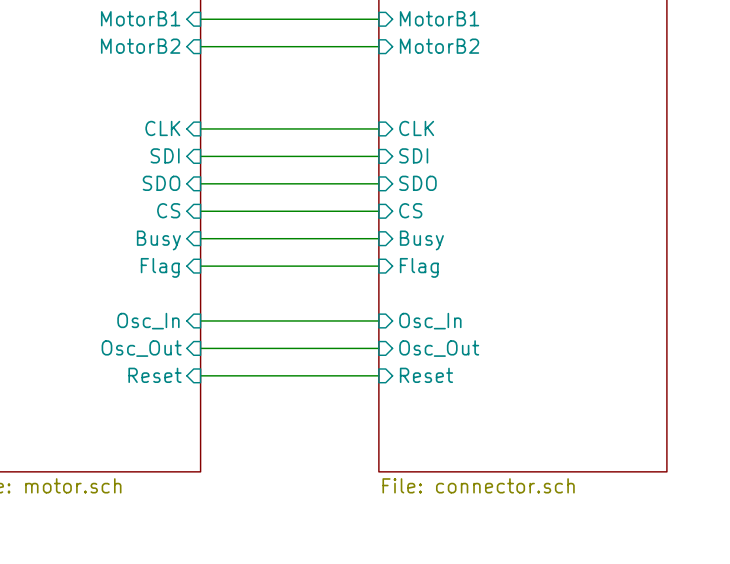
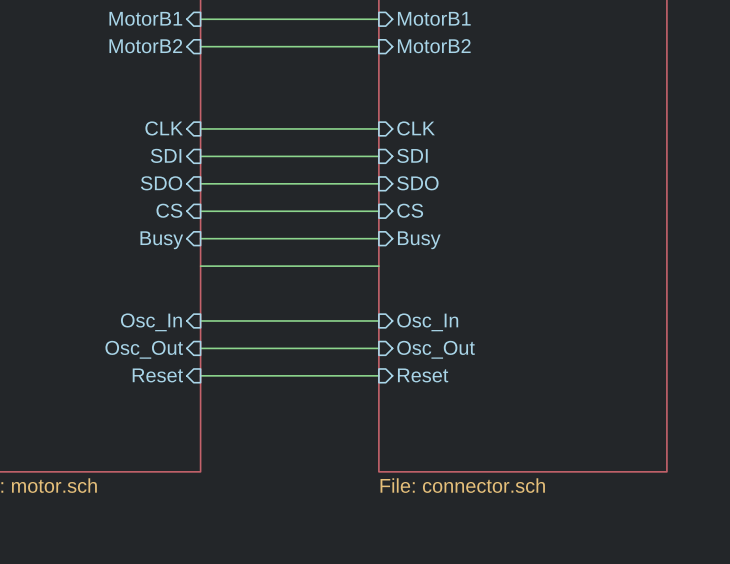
sheet pin: Flag (160, 267) -> none
sheet pin: Flag (419, 267) -> none

